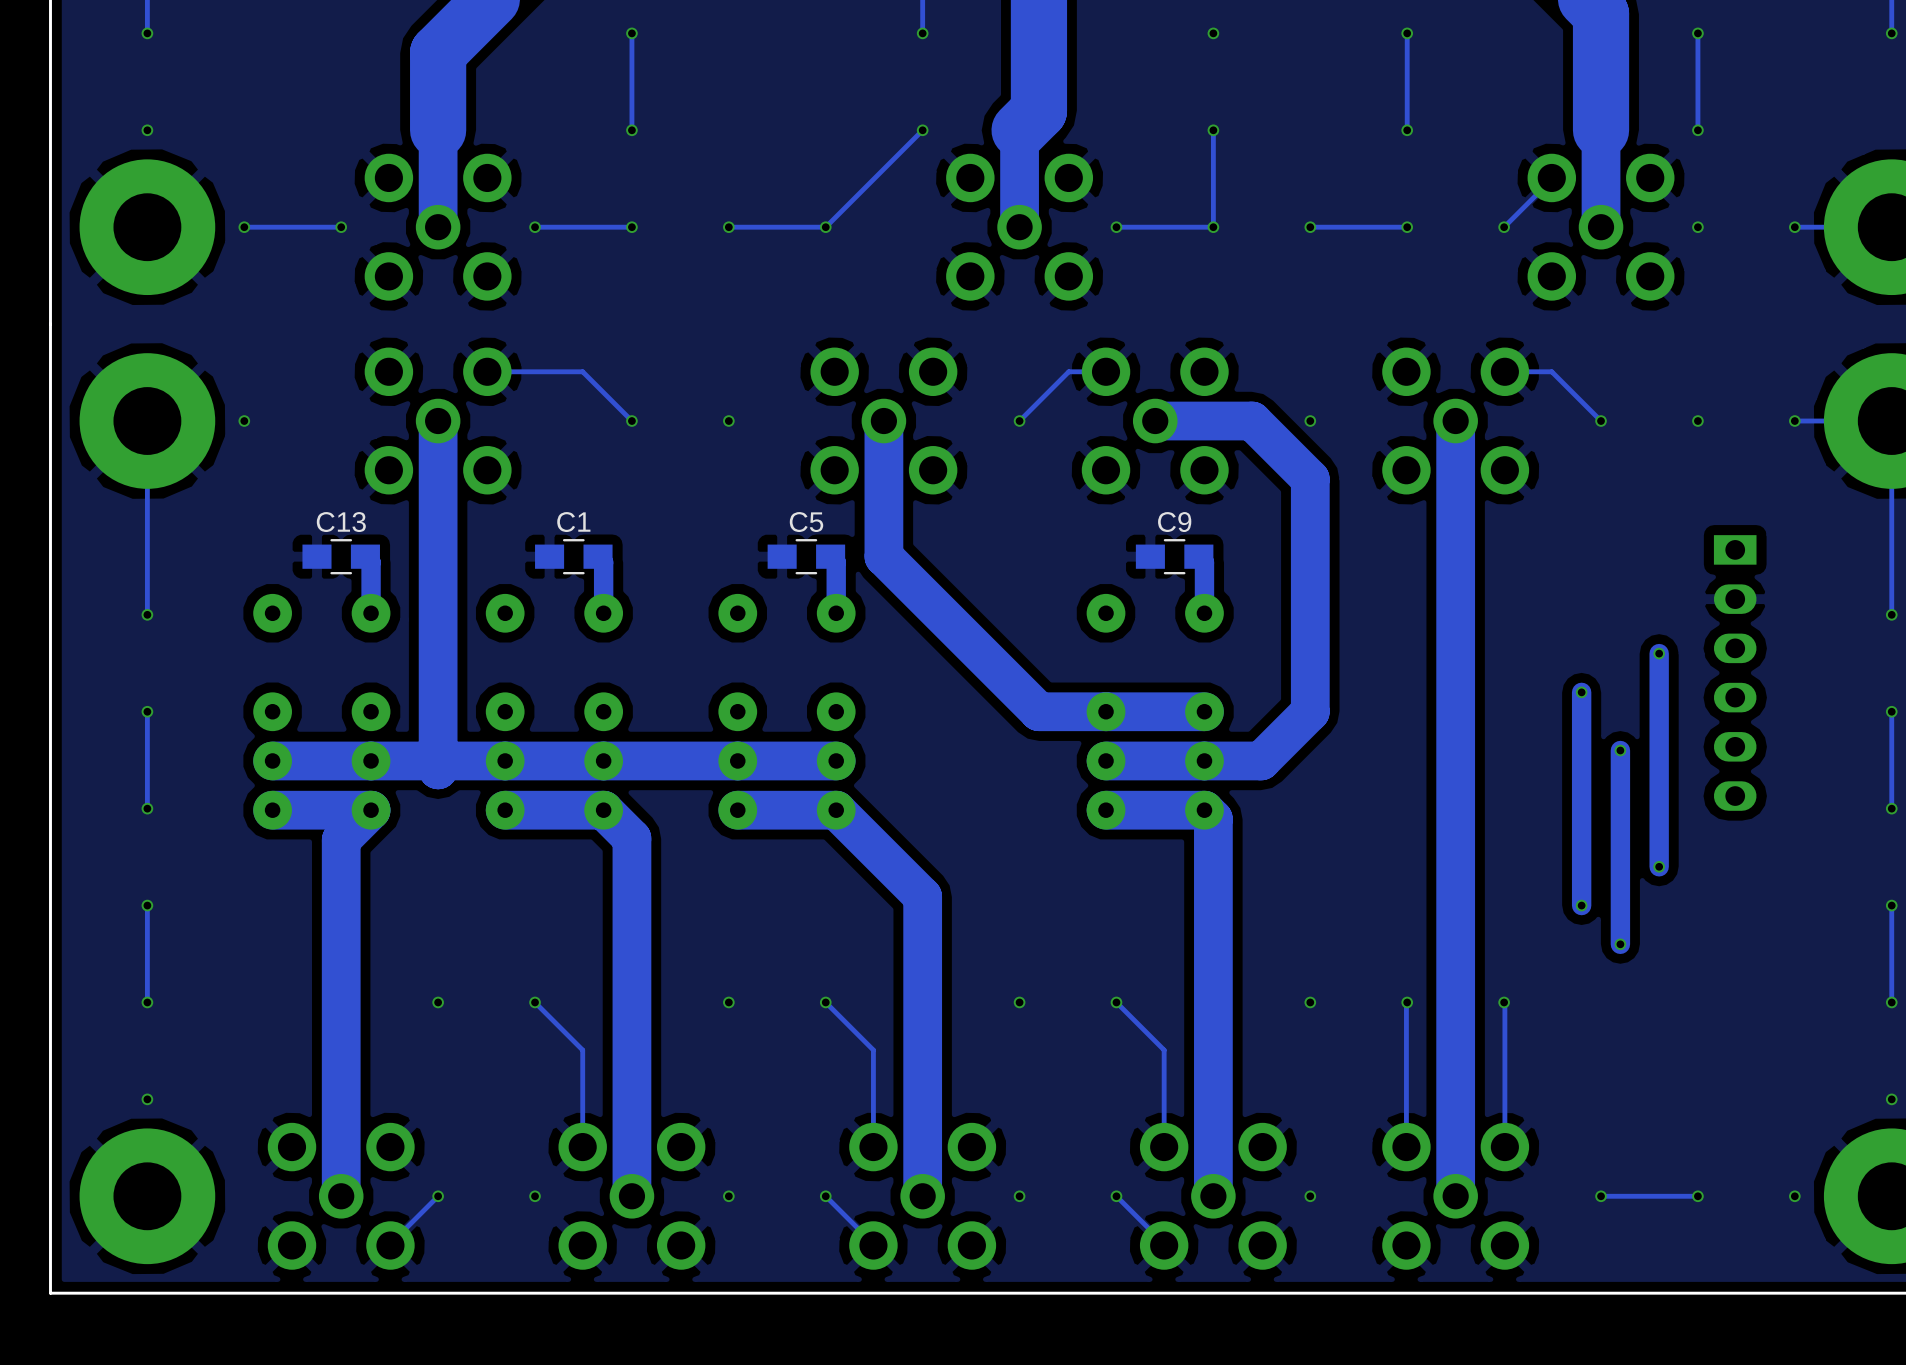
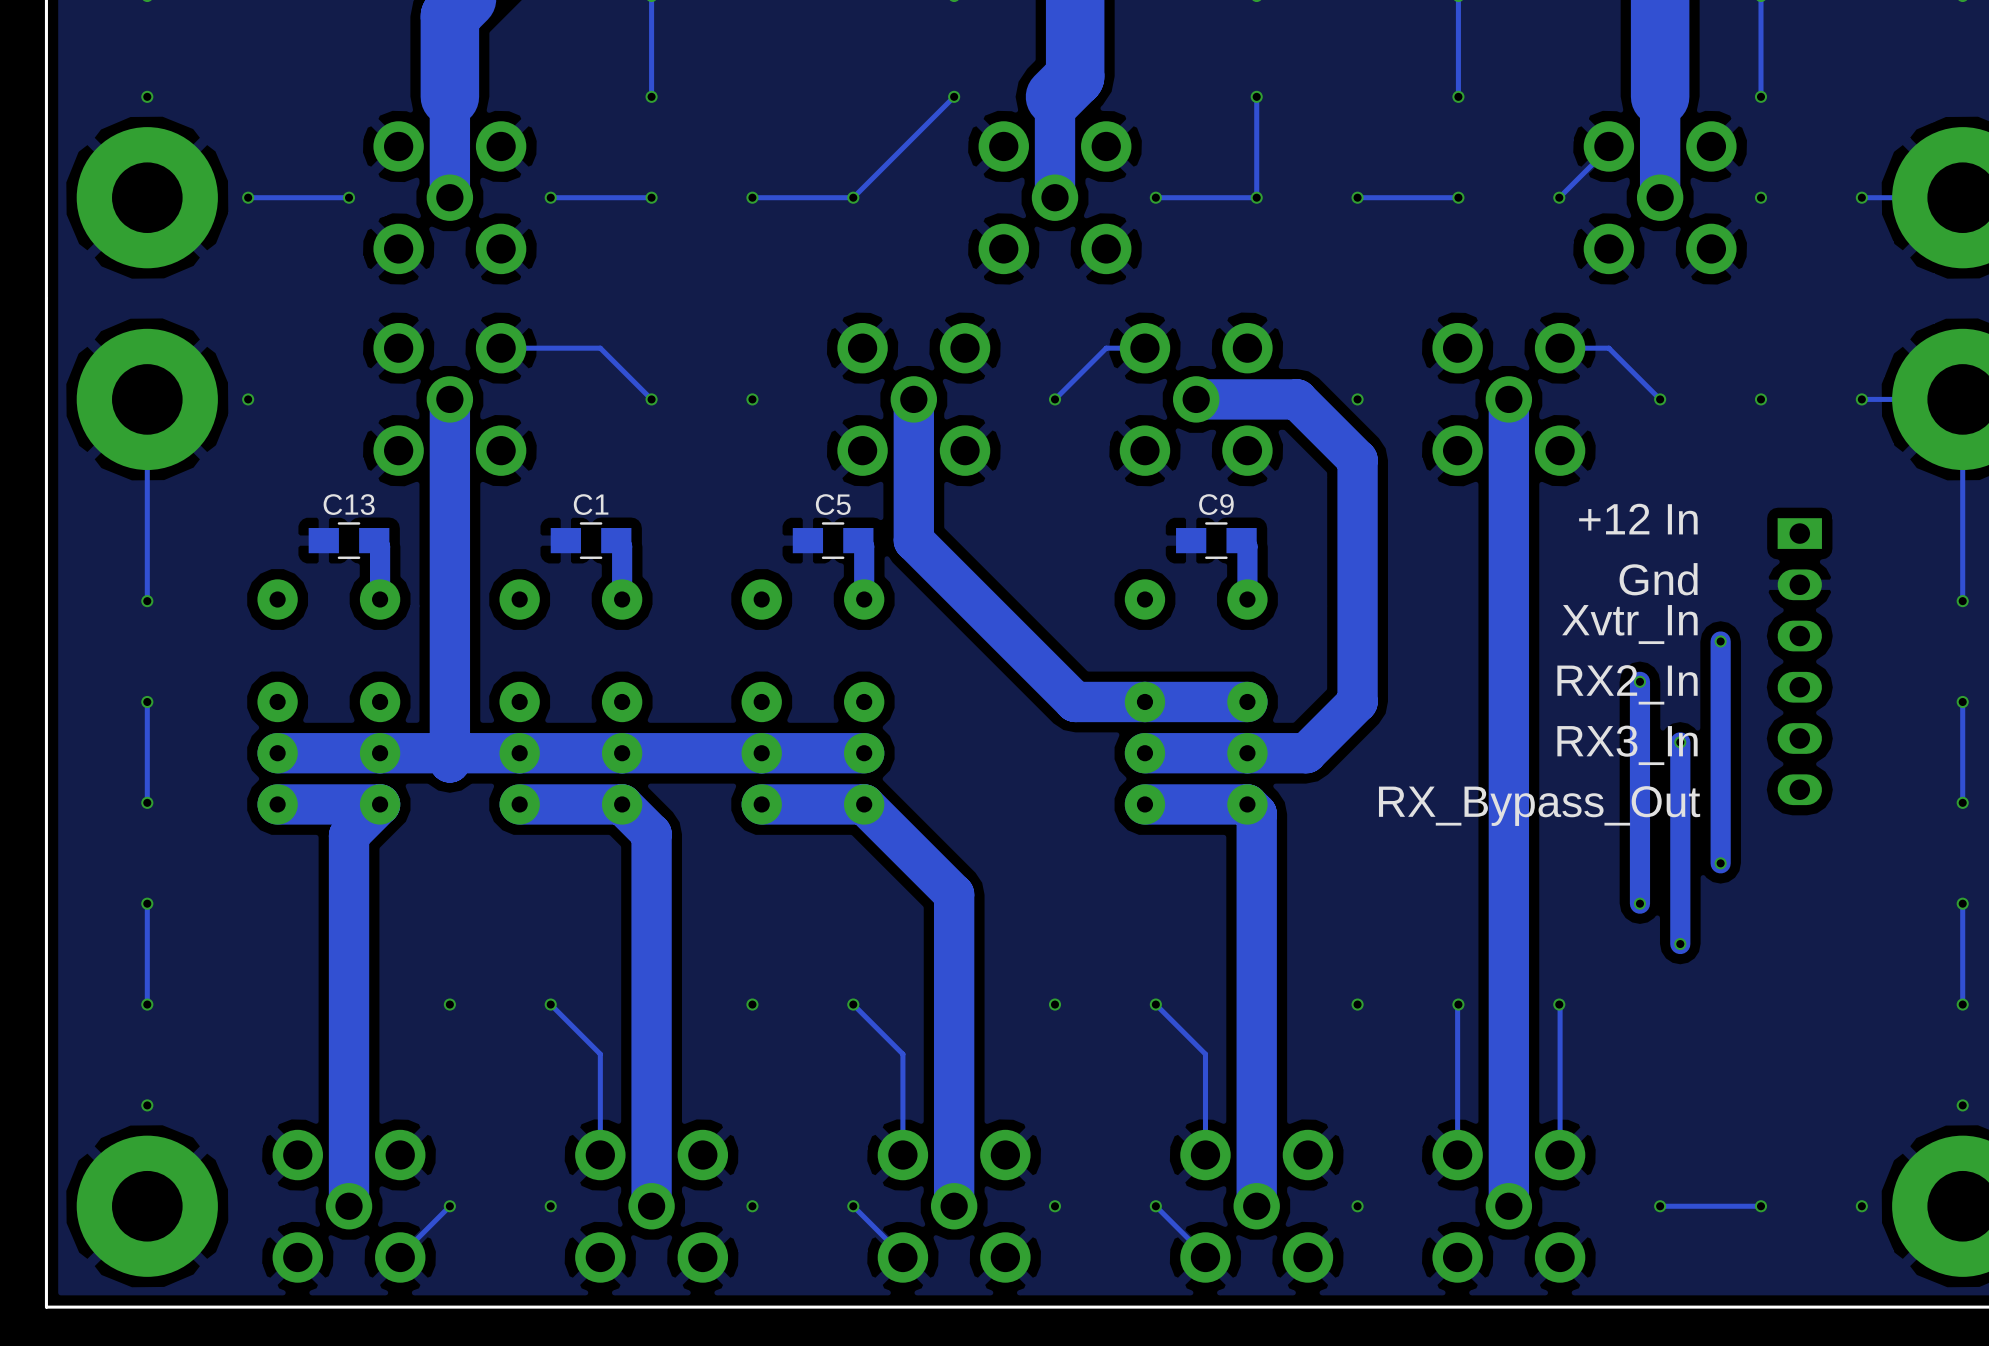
text: none -> +12 In (1638, 519)
text: none -> Gnd (1658, 579)
text: none -> Xvtr_In (1629, 624)
text: none -> RX2_In (1627, 684)
text: none -> RX3_In (1627, 745)
text: none -> RX_Bypass_Out (1539, 806)

